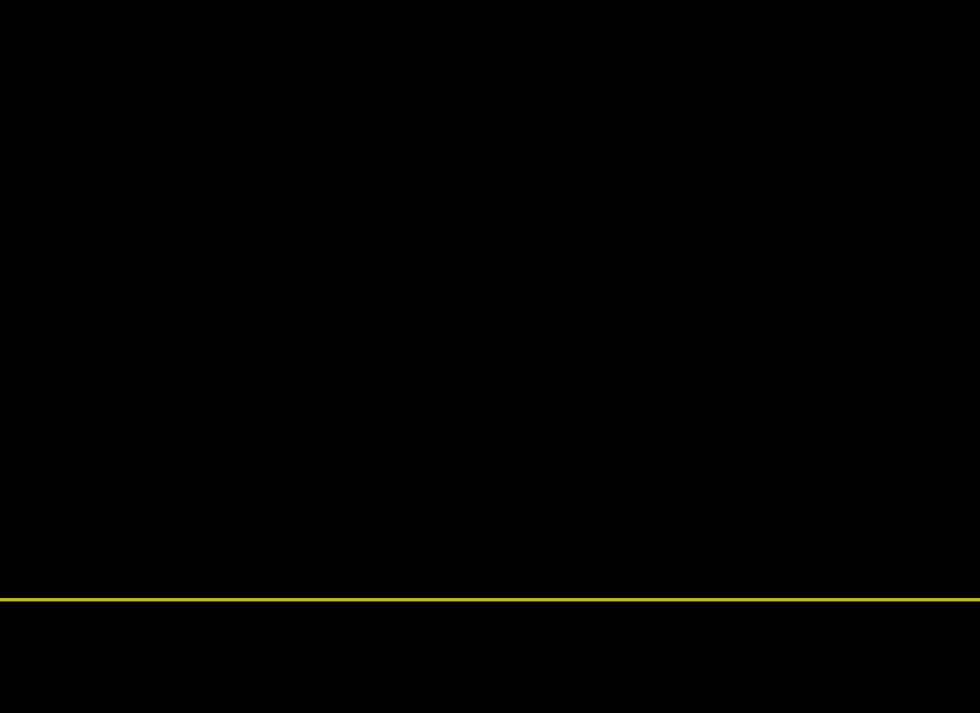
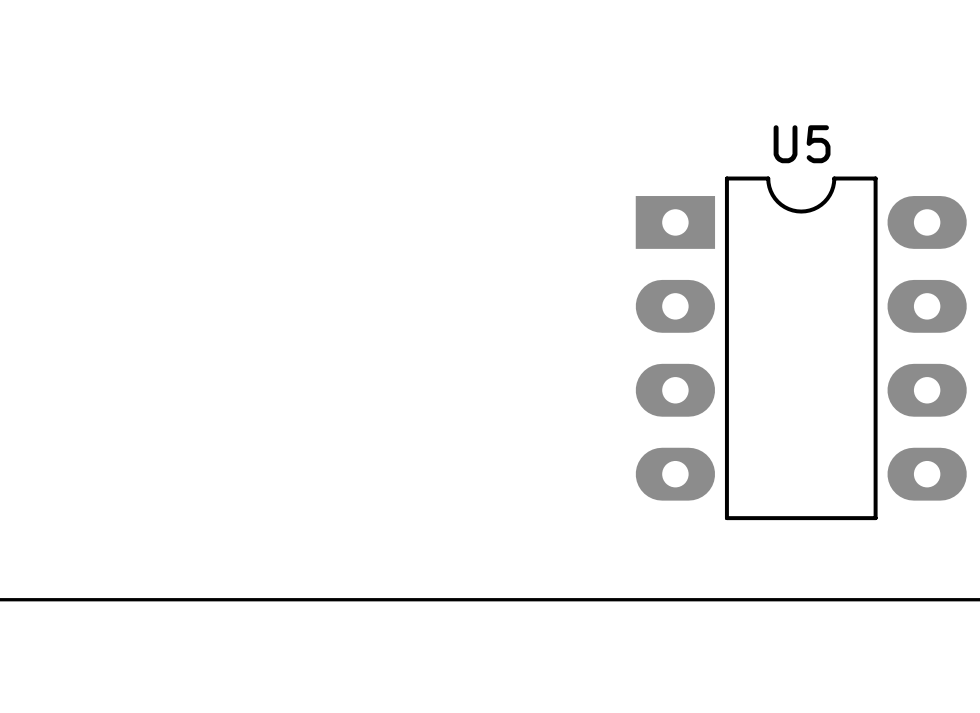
U5: none -> (801, 348)

